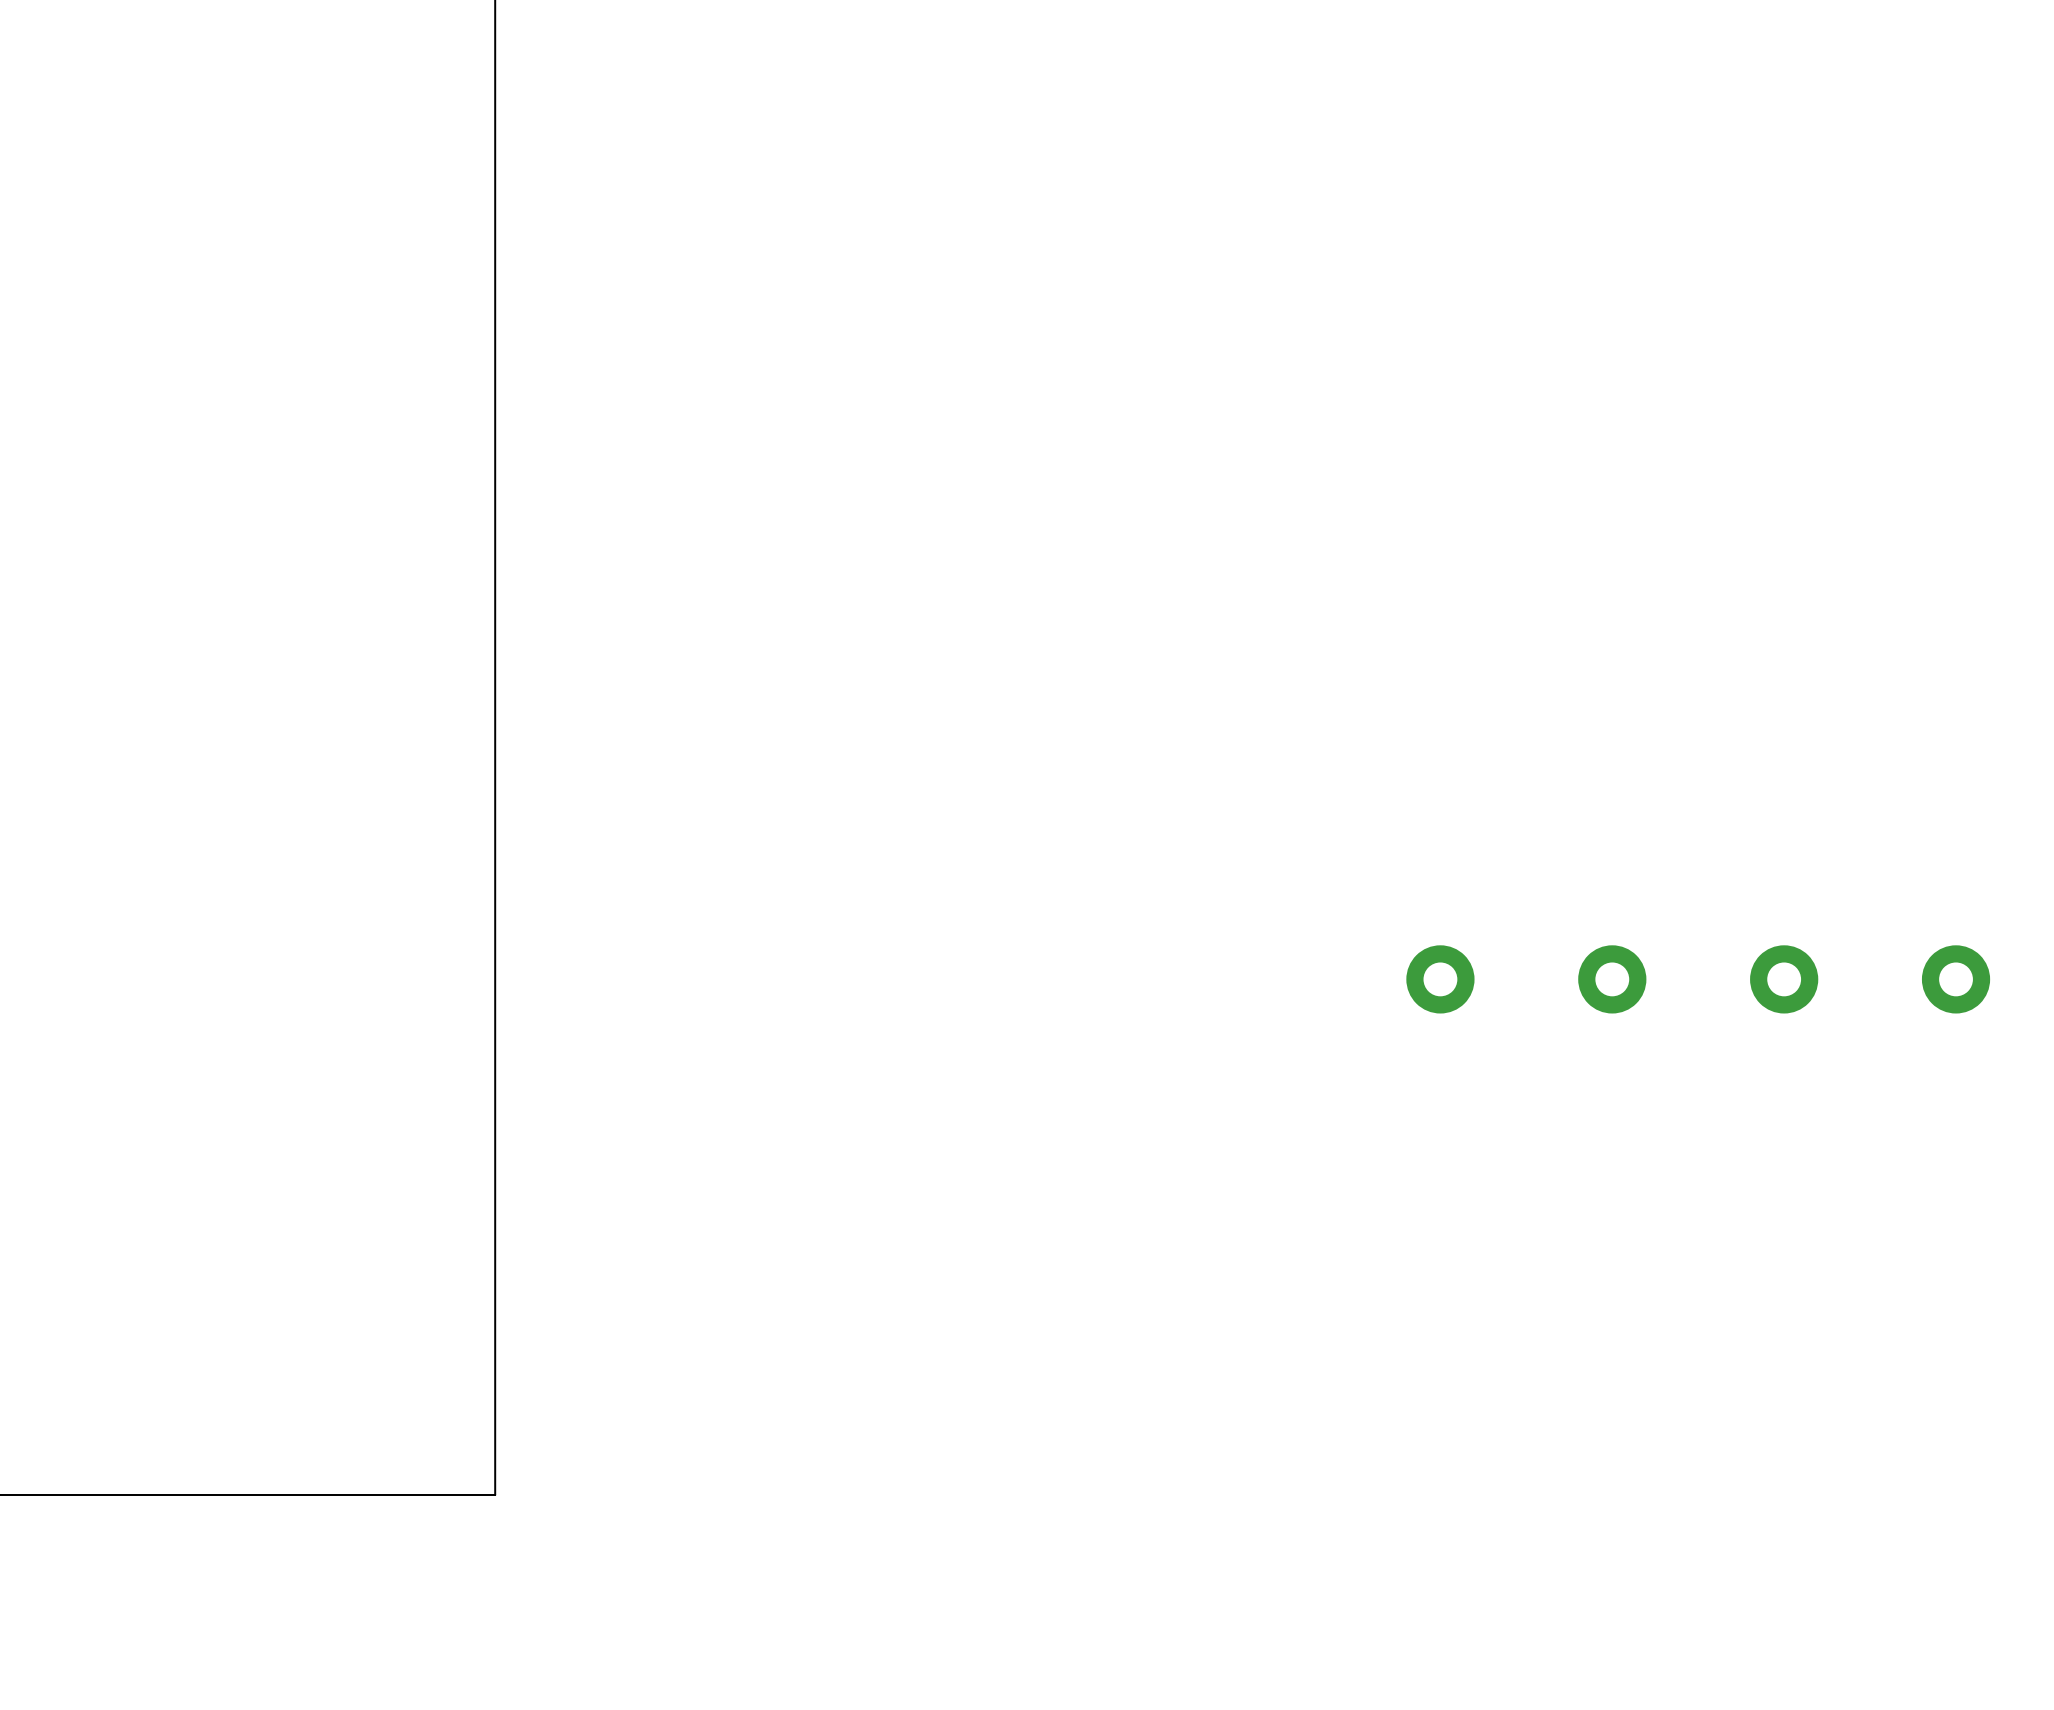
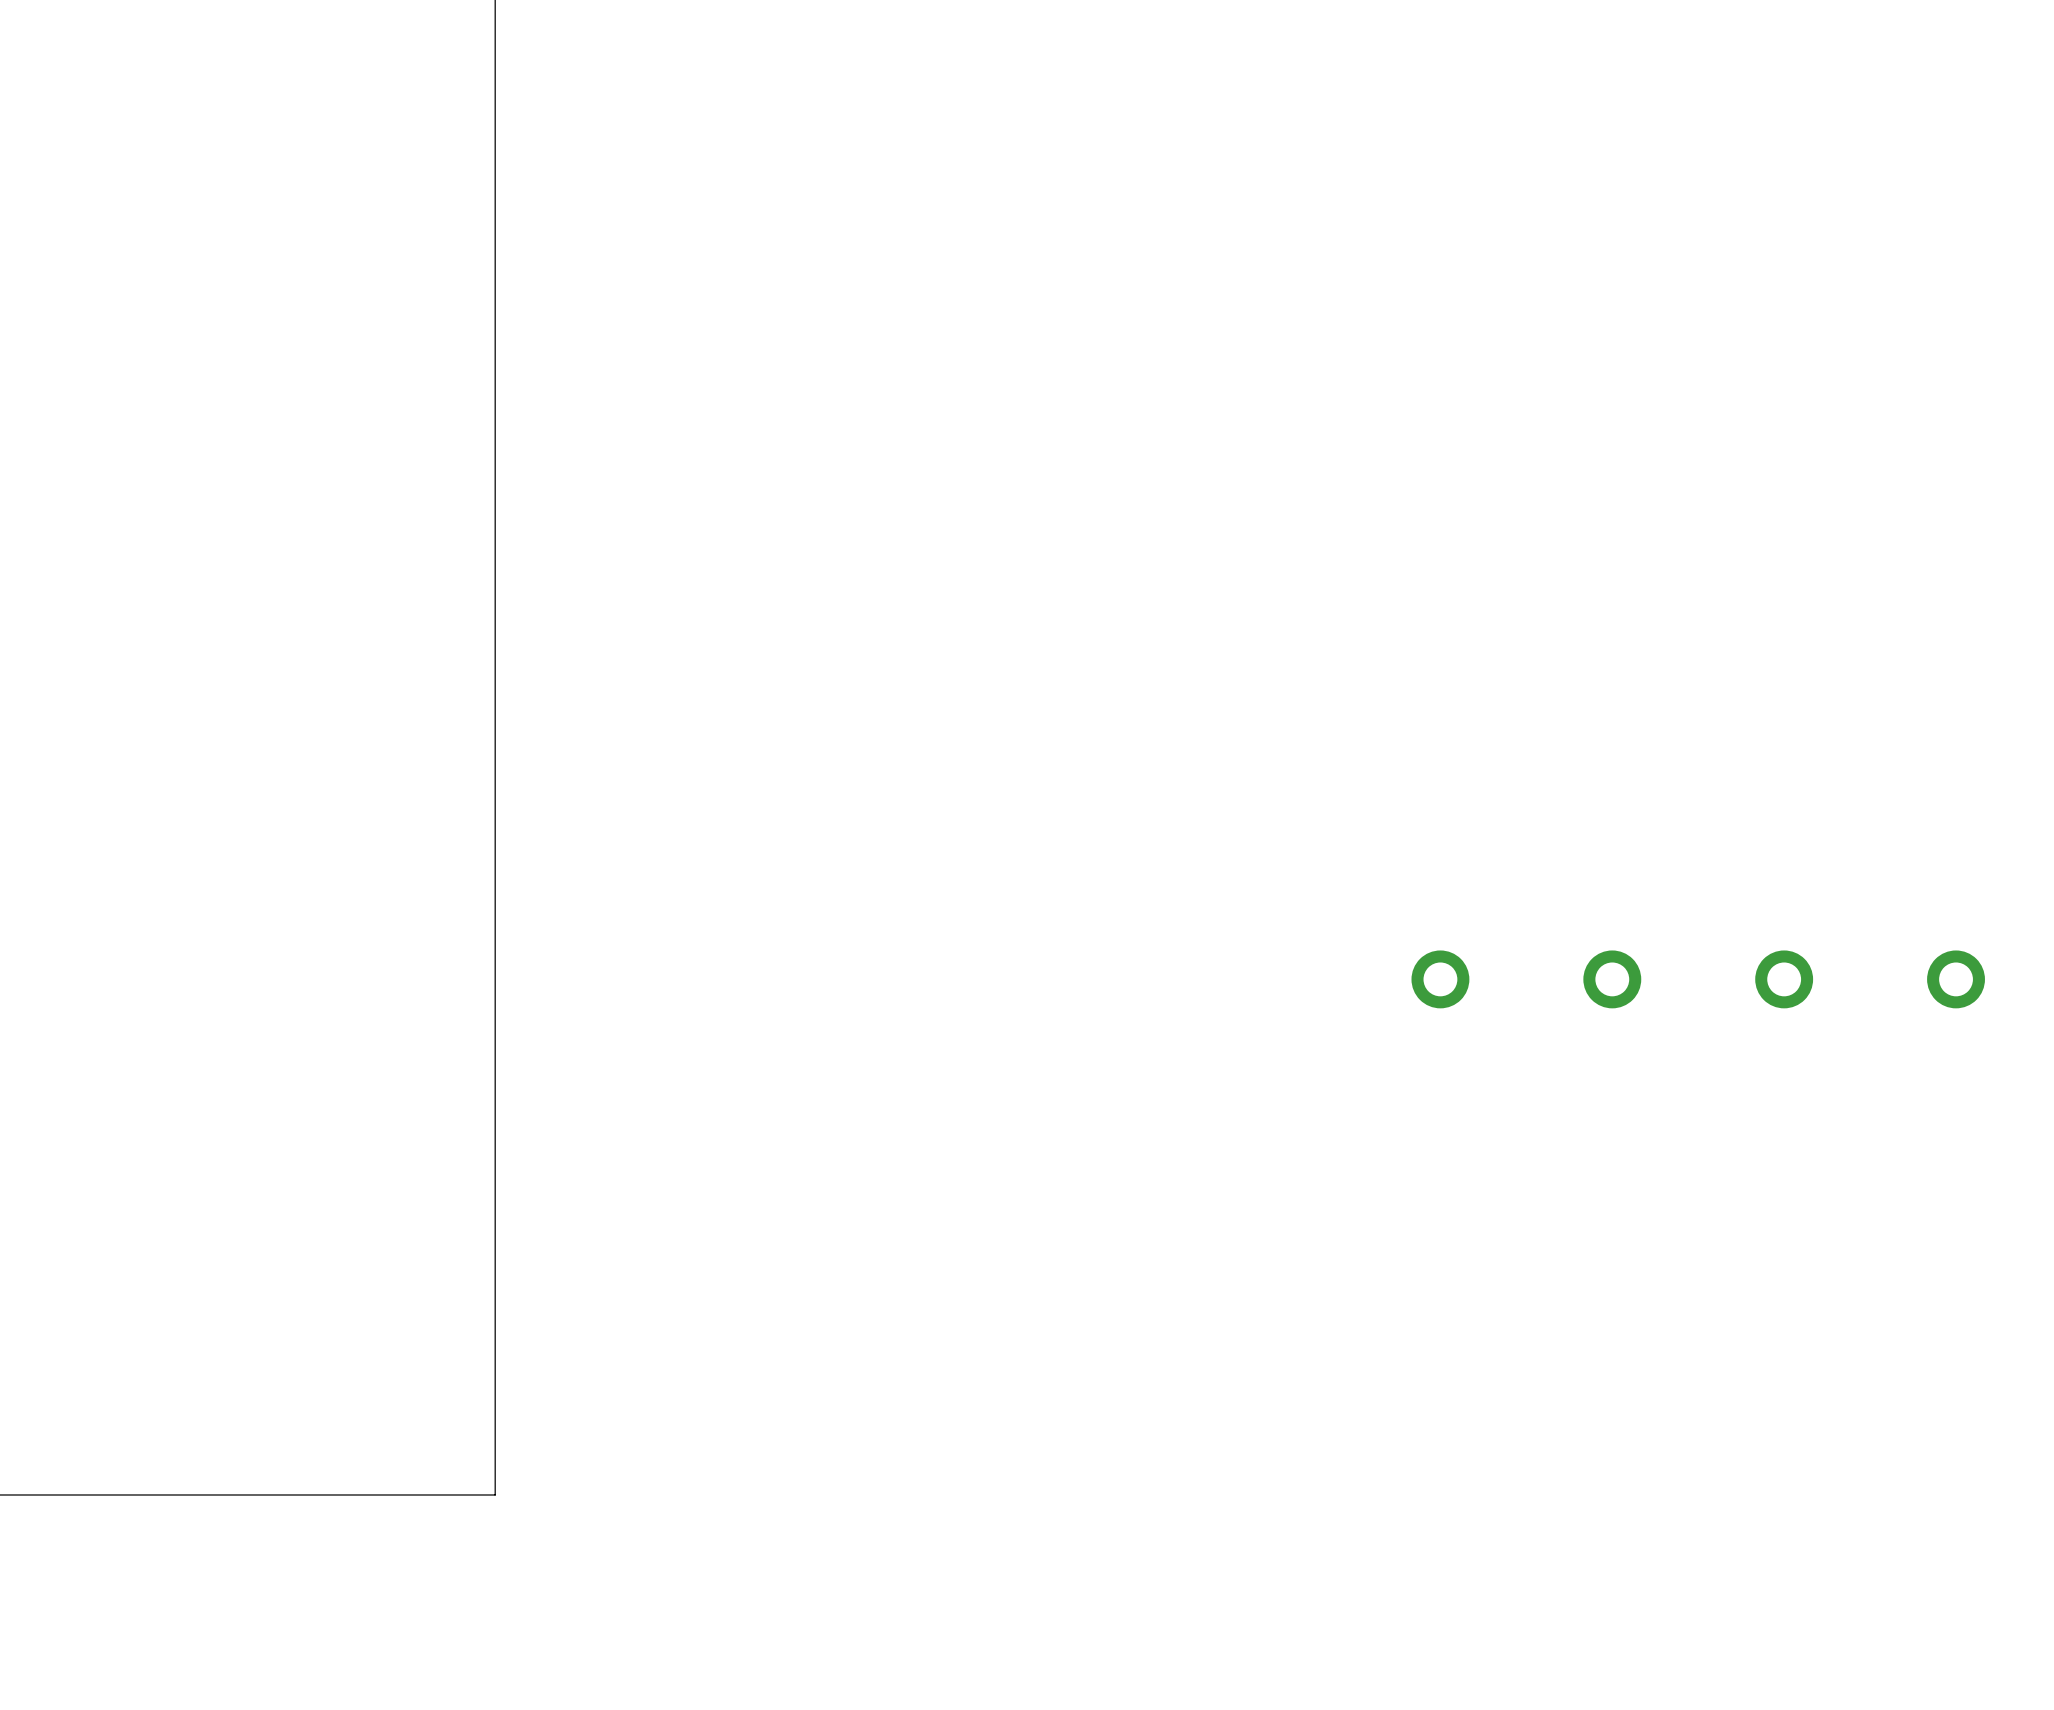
part footprint: [1406, 945, 1475, 1014] -> [1411, 950, 1470, 1009]
part footprint: [1578, 945, 1647, 1014] -> [1583, 950, 1642, 1009]
part footprint: [1750, 945, 1819, 1014] -> [1755, 950, 1814, 1009]
part footprint: [1921, 945, 1991, 1014] -> [1927, 950, 1985, 1009]

